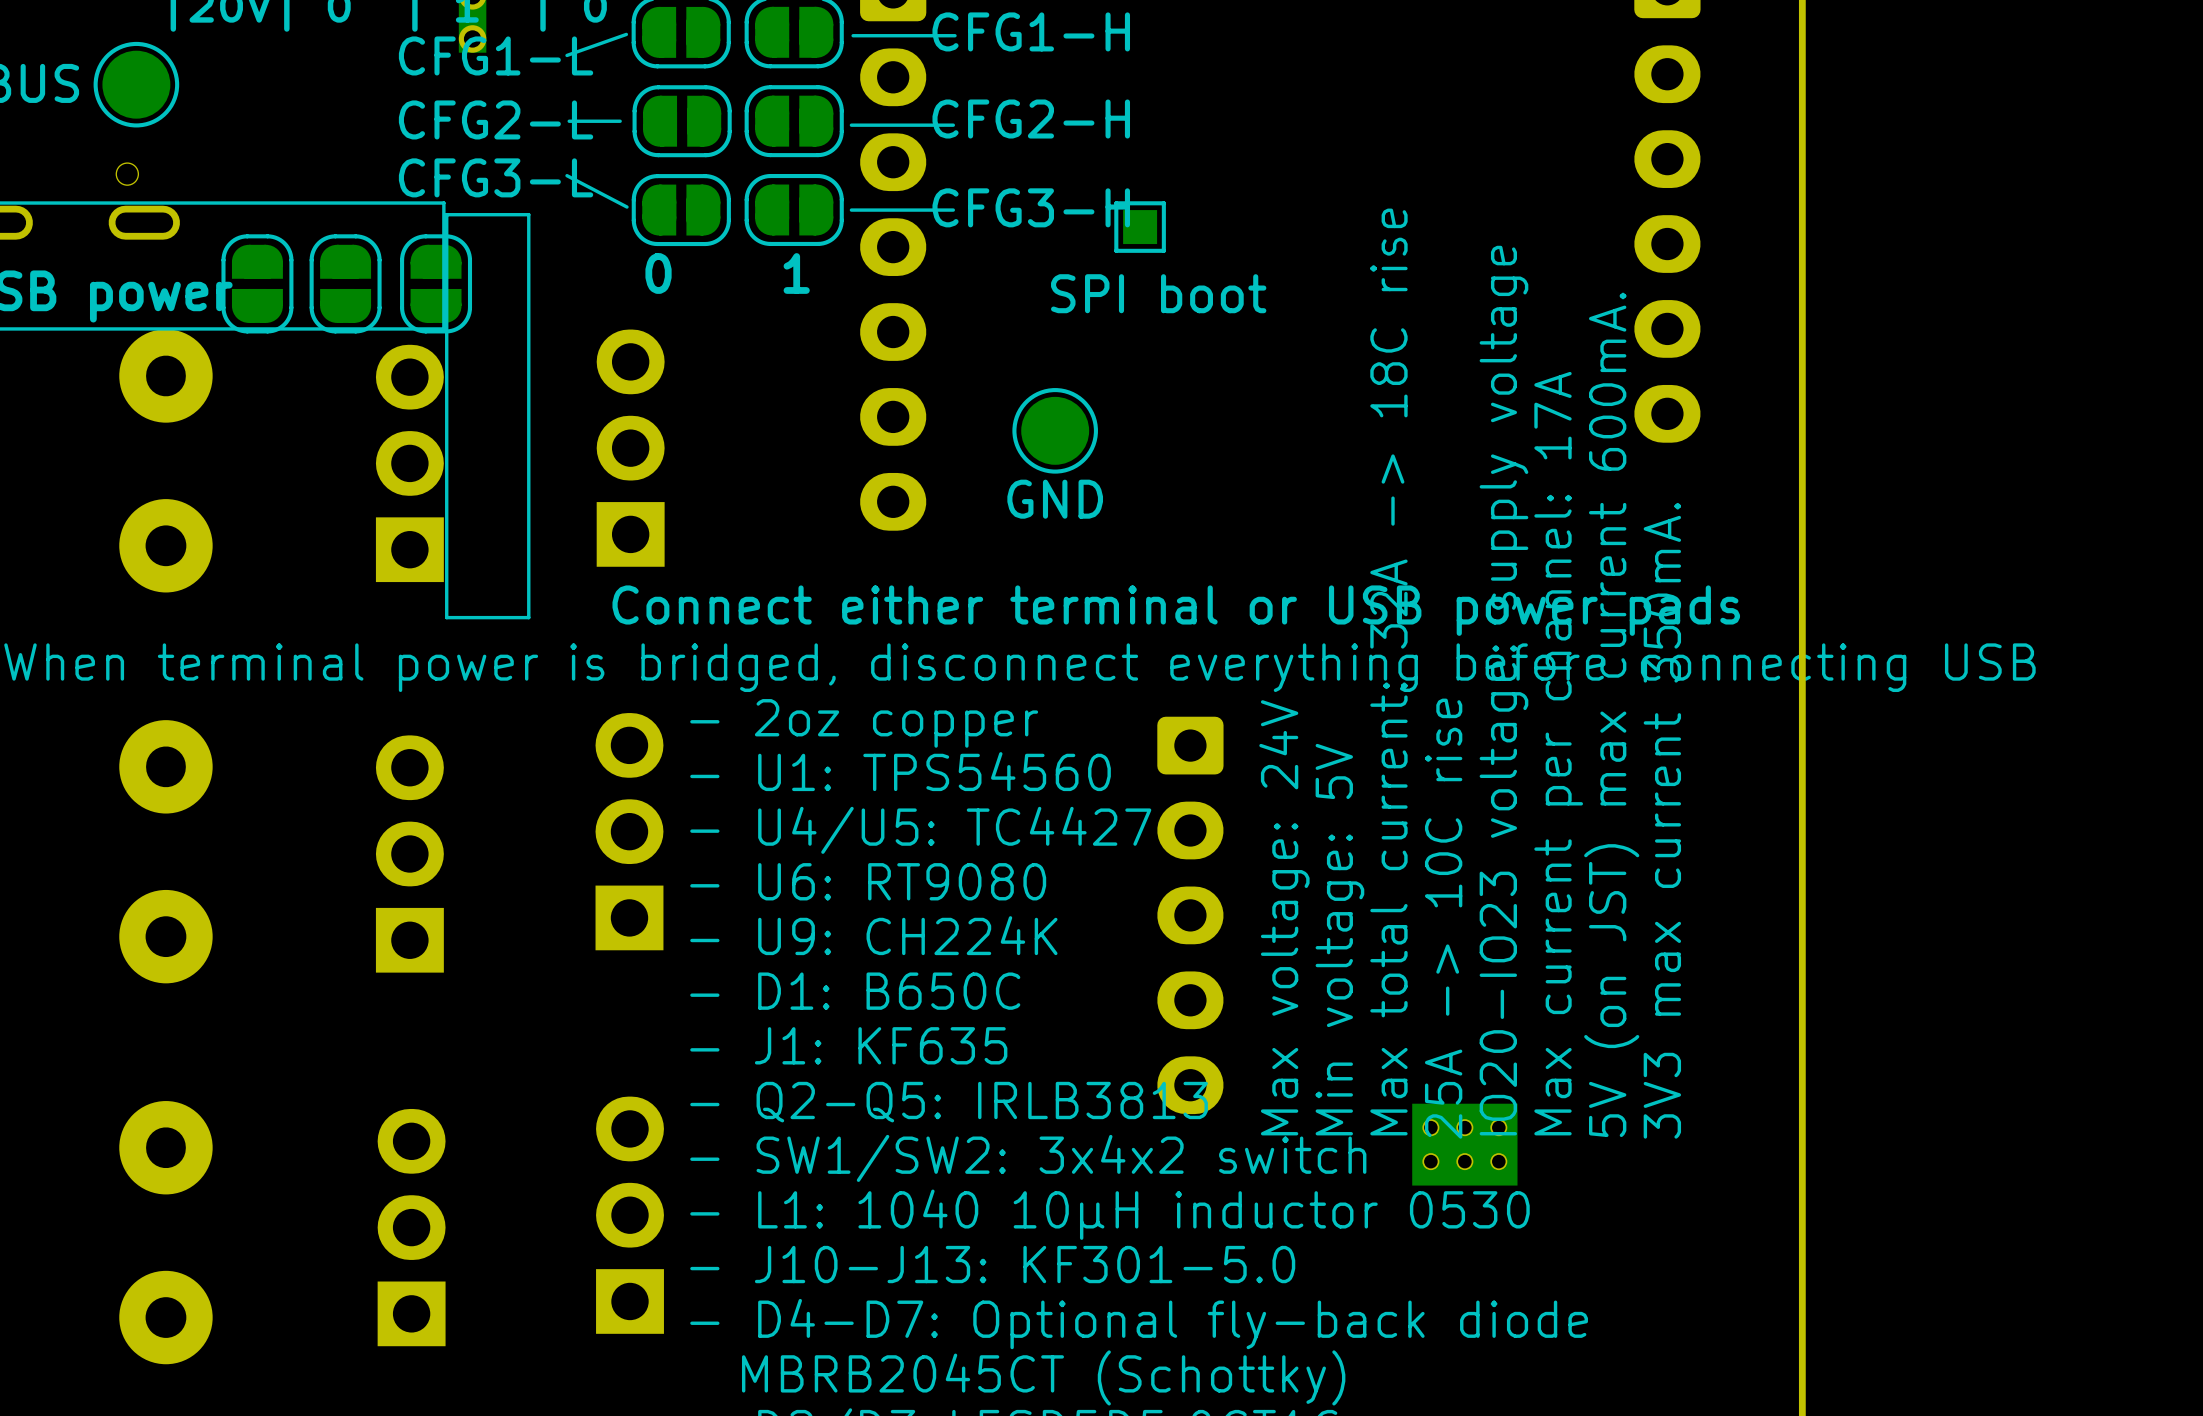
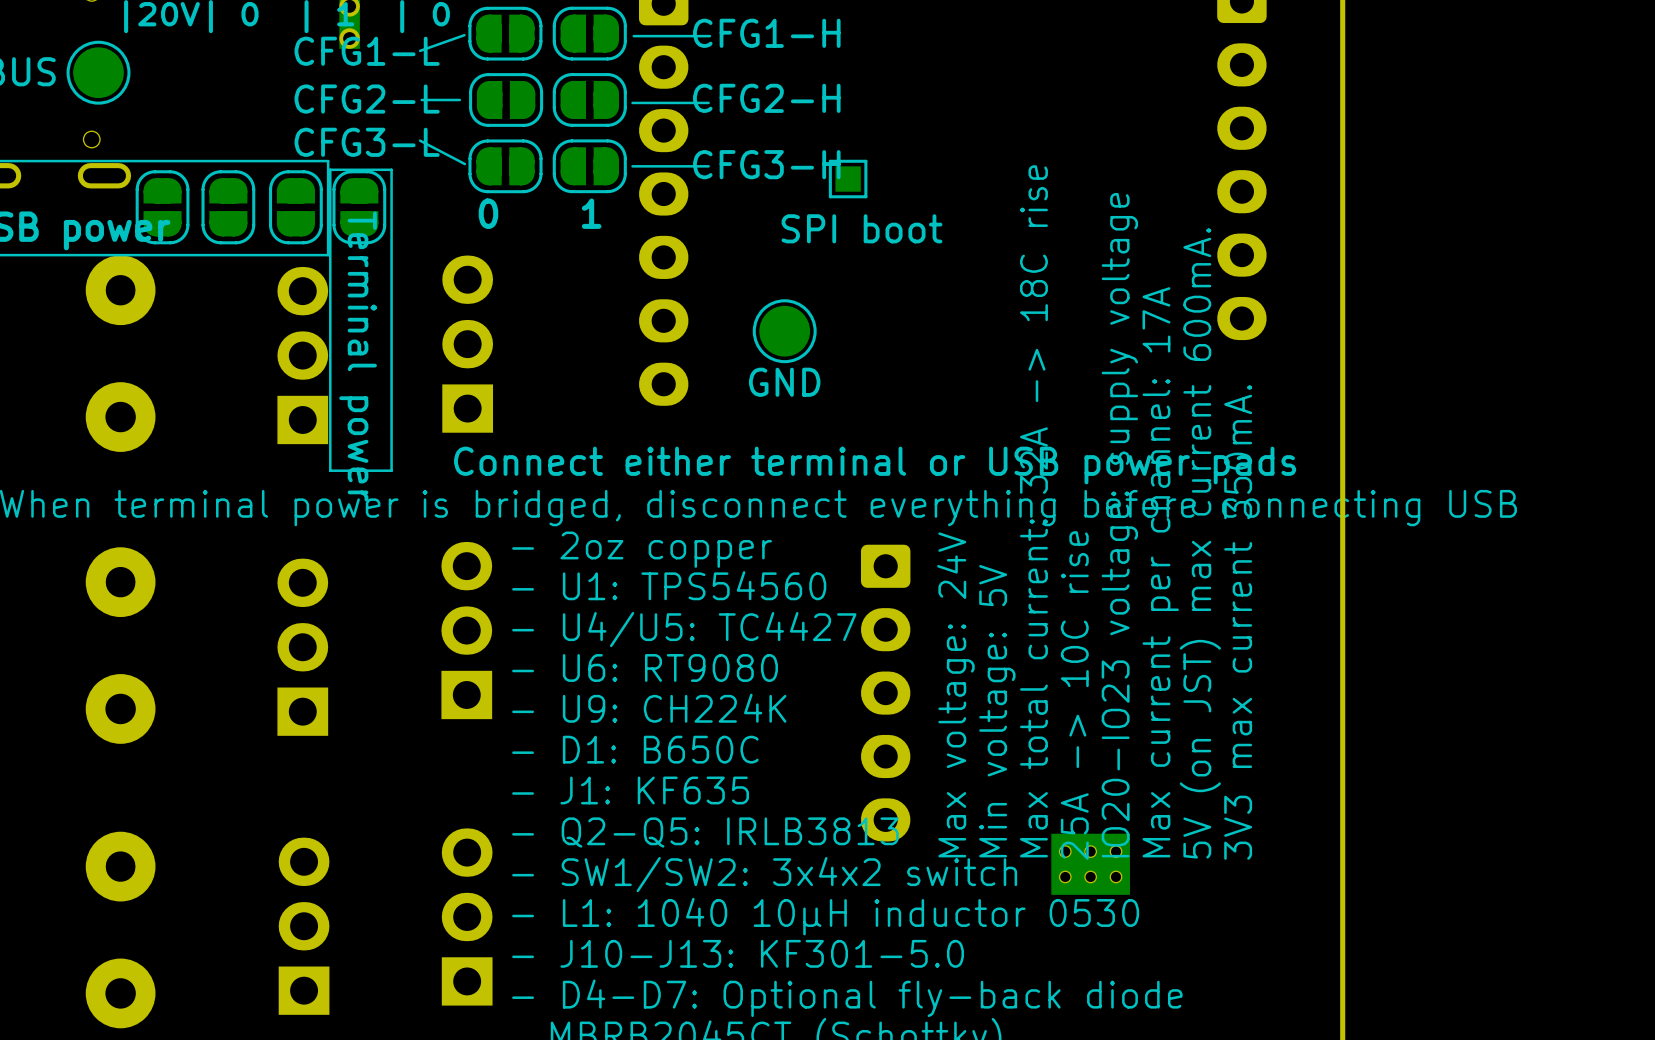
part: none -> (162, 207)
part: none -> (228, 207)
part: none -> (295, 207)
part: none -> Terminal power (359, 207)
part: (257, 283) -> none
part: (345, 283) -> none
part: (436, 283) -> none

